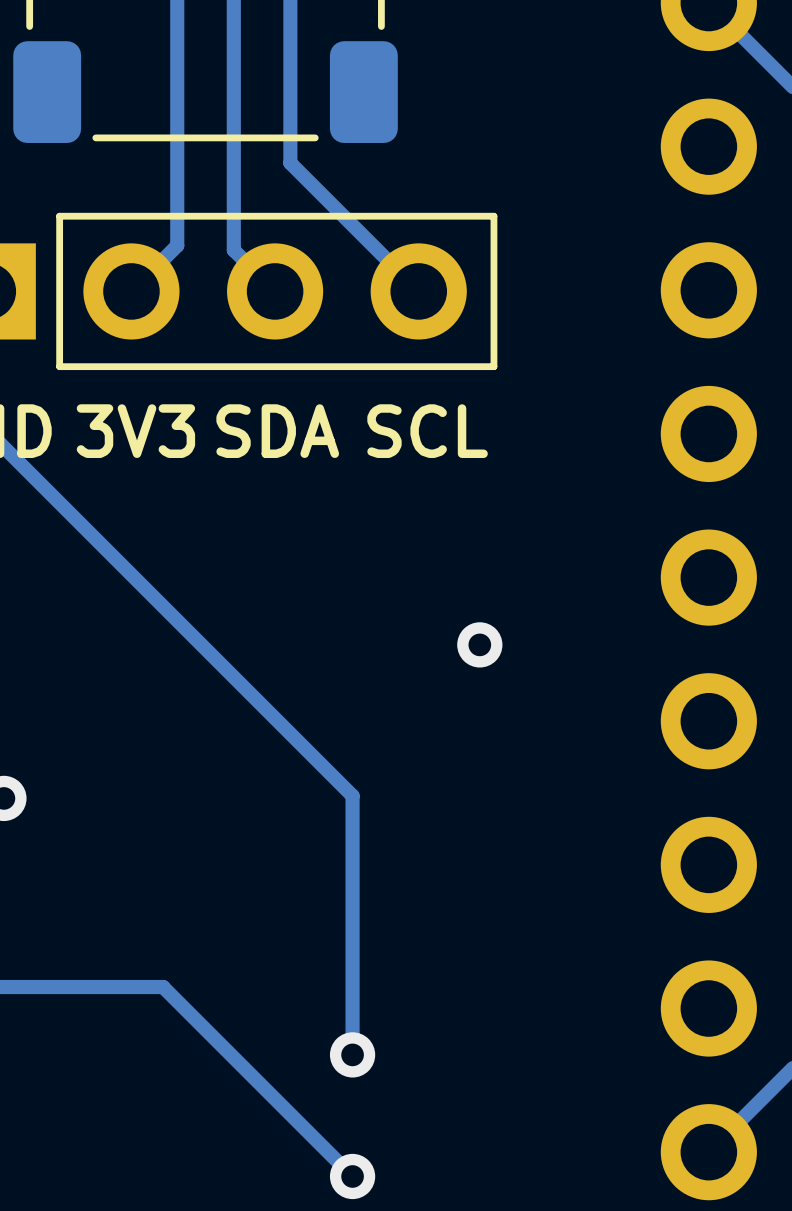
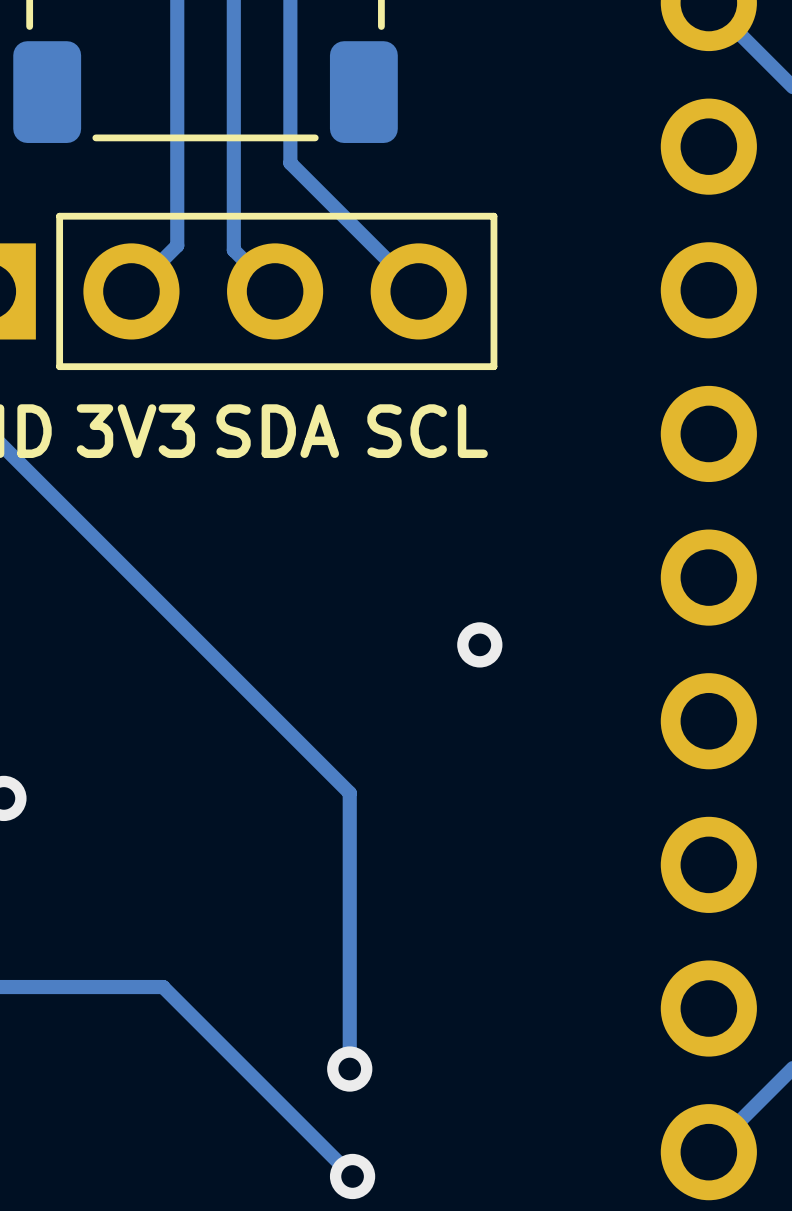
track: (349, 793) (352, 795) (352, 1054) -> (349, 793) (349, 1069)
via position: (352, 1054) -> (349, 1069)

